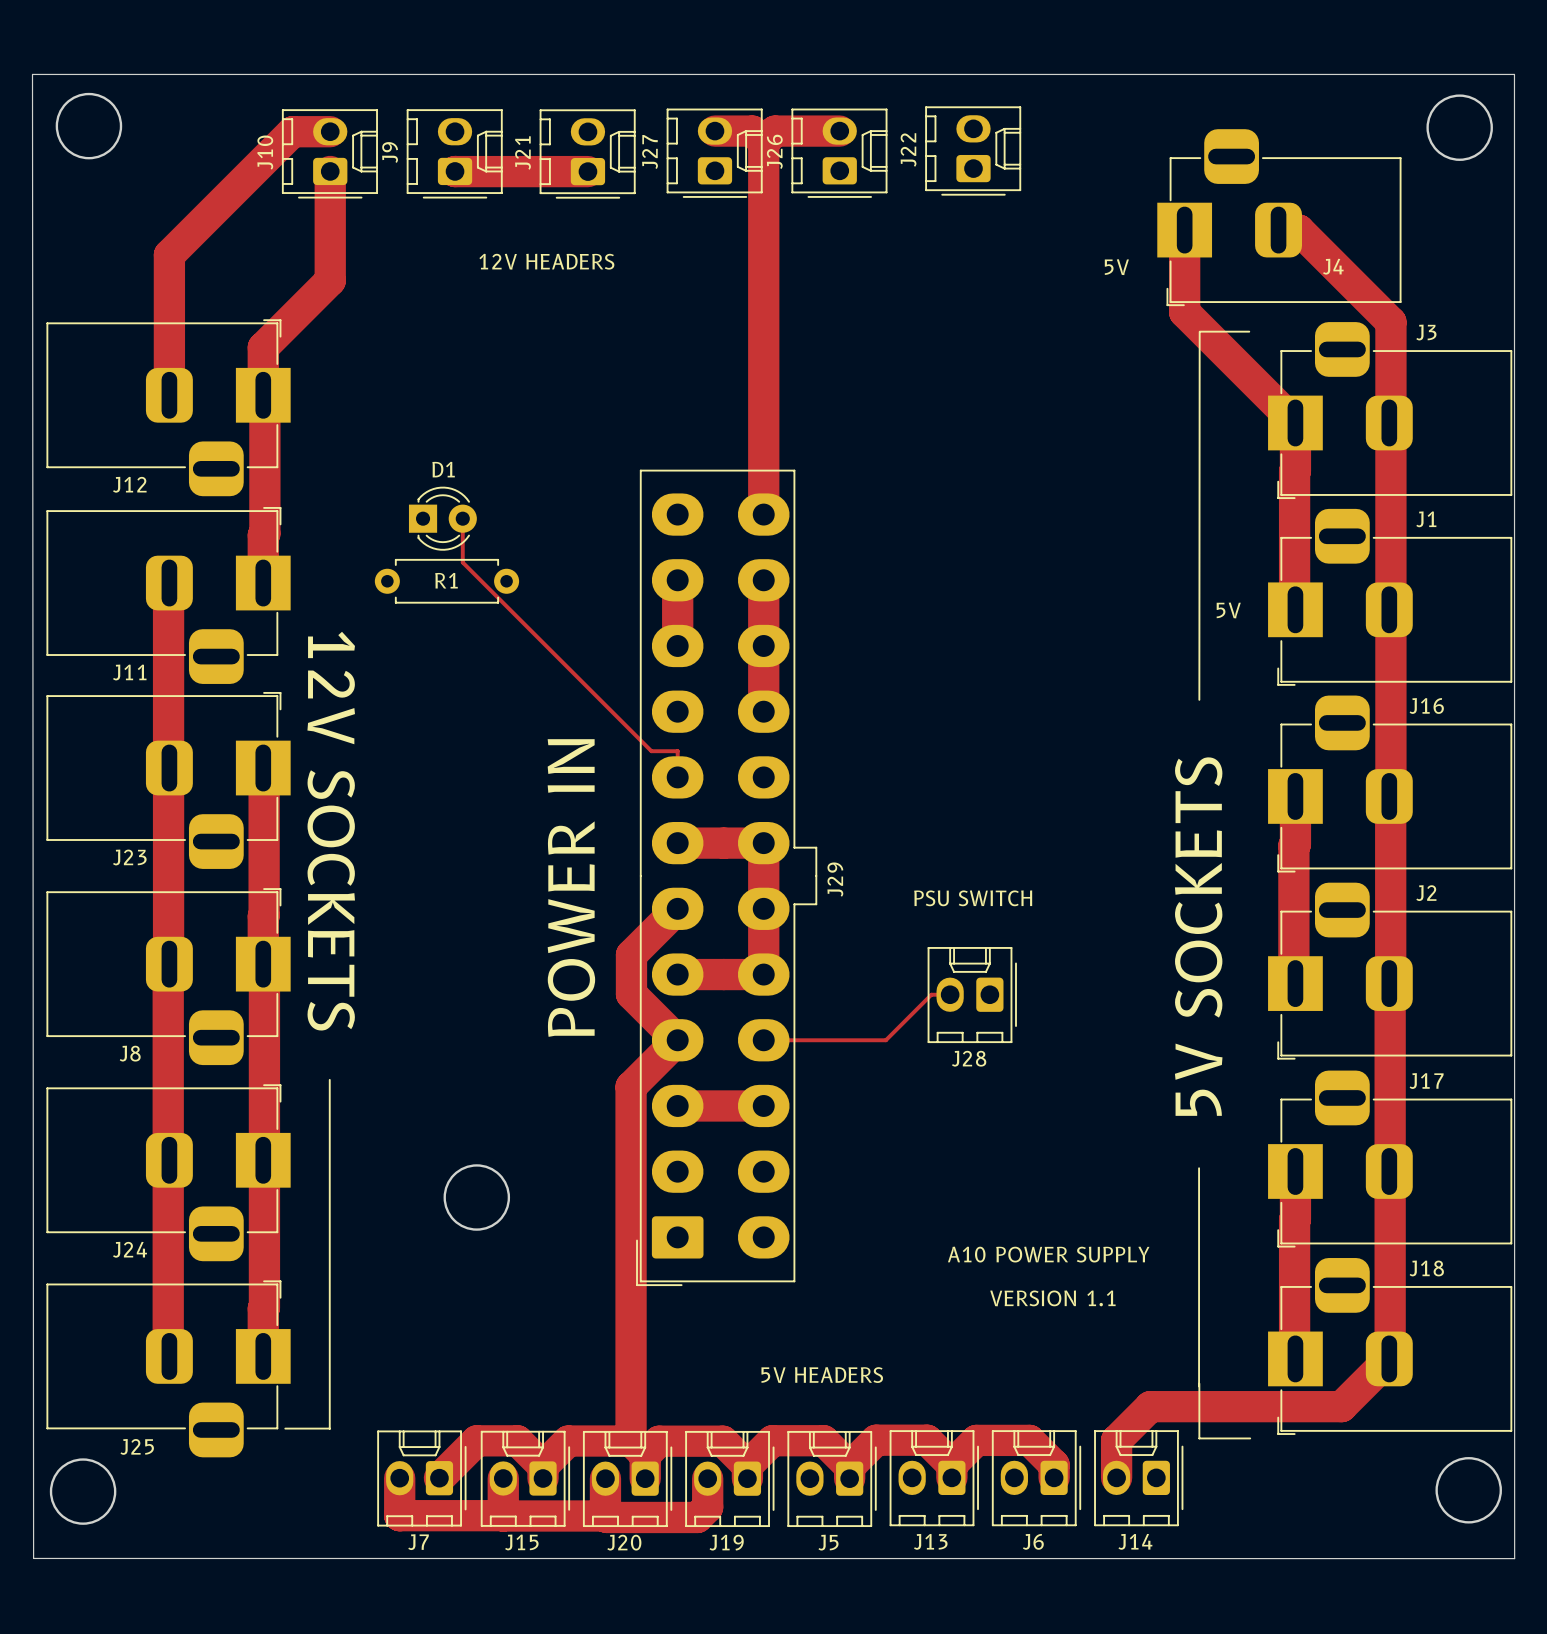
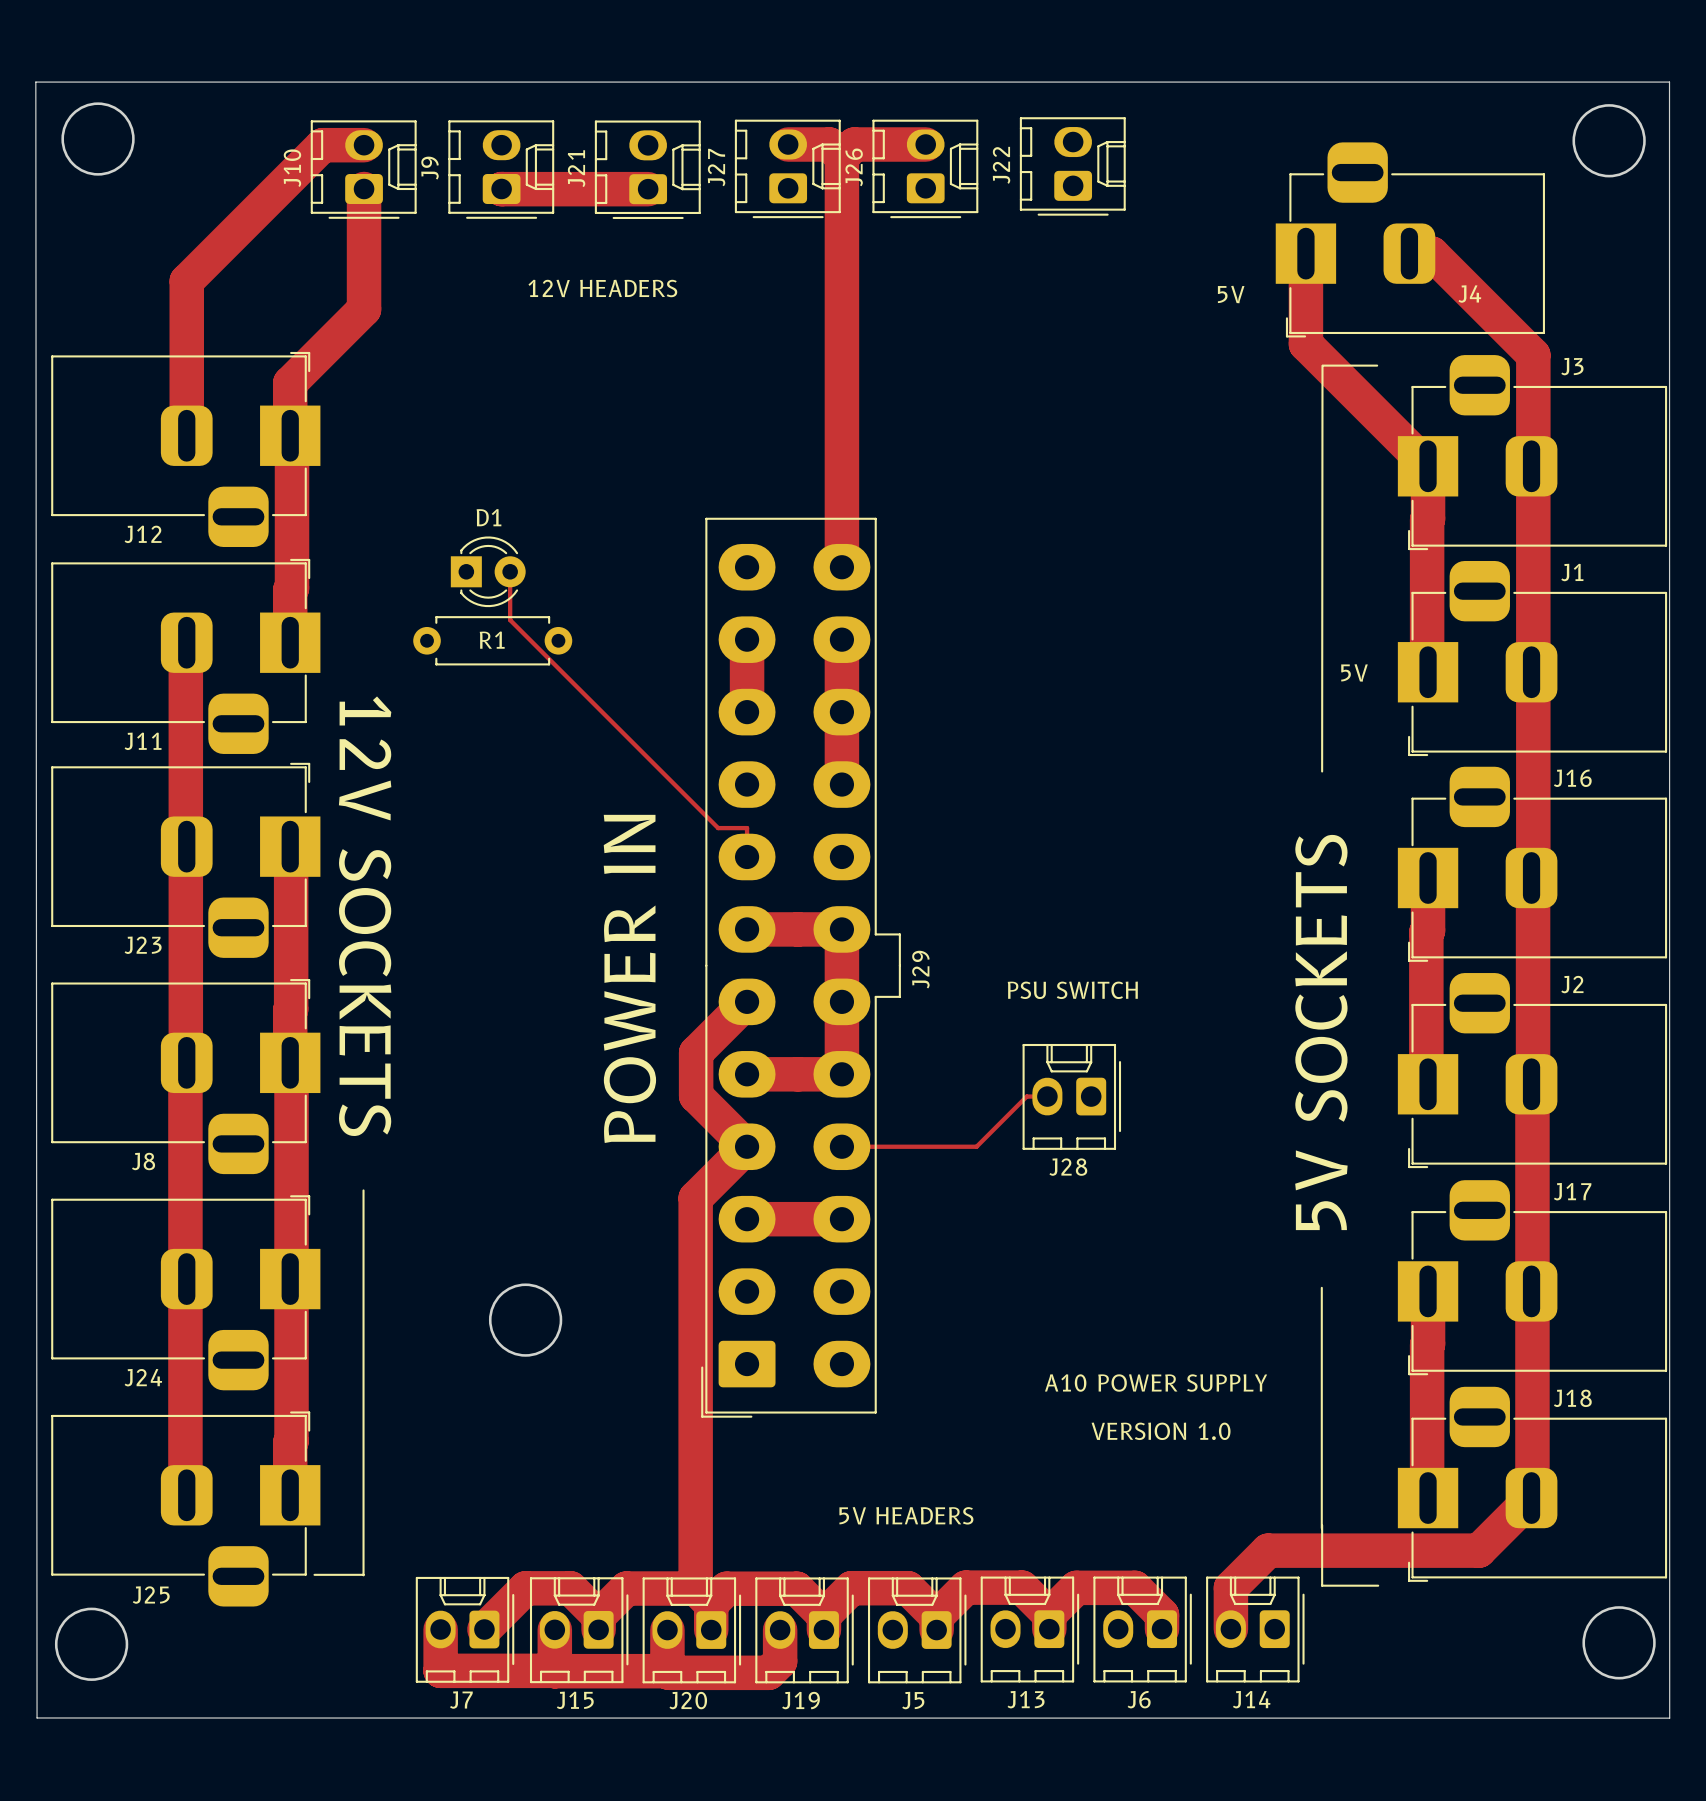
text: VERSION 1.1 (1052, 1298) -> VERSION 1.0 (1161, 1431)

